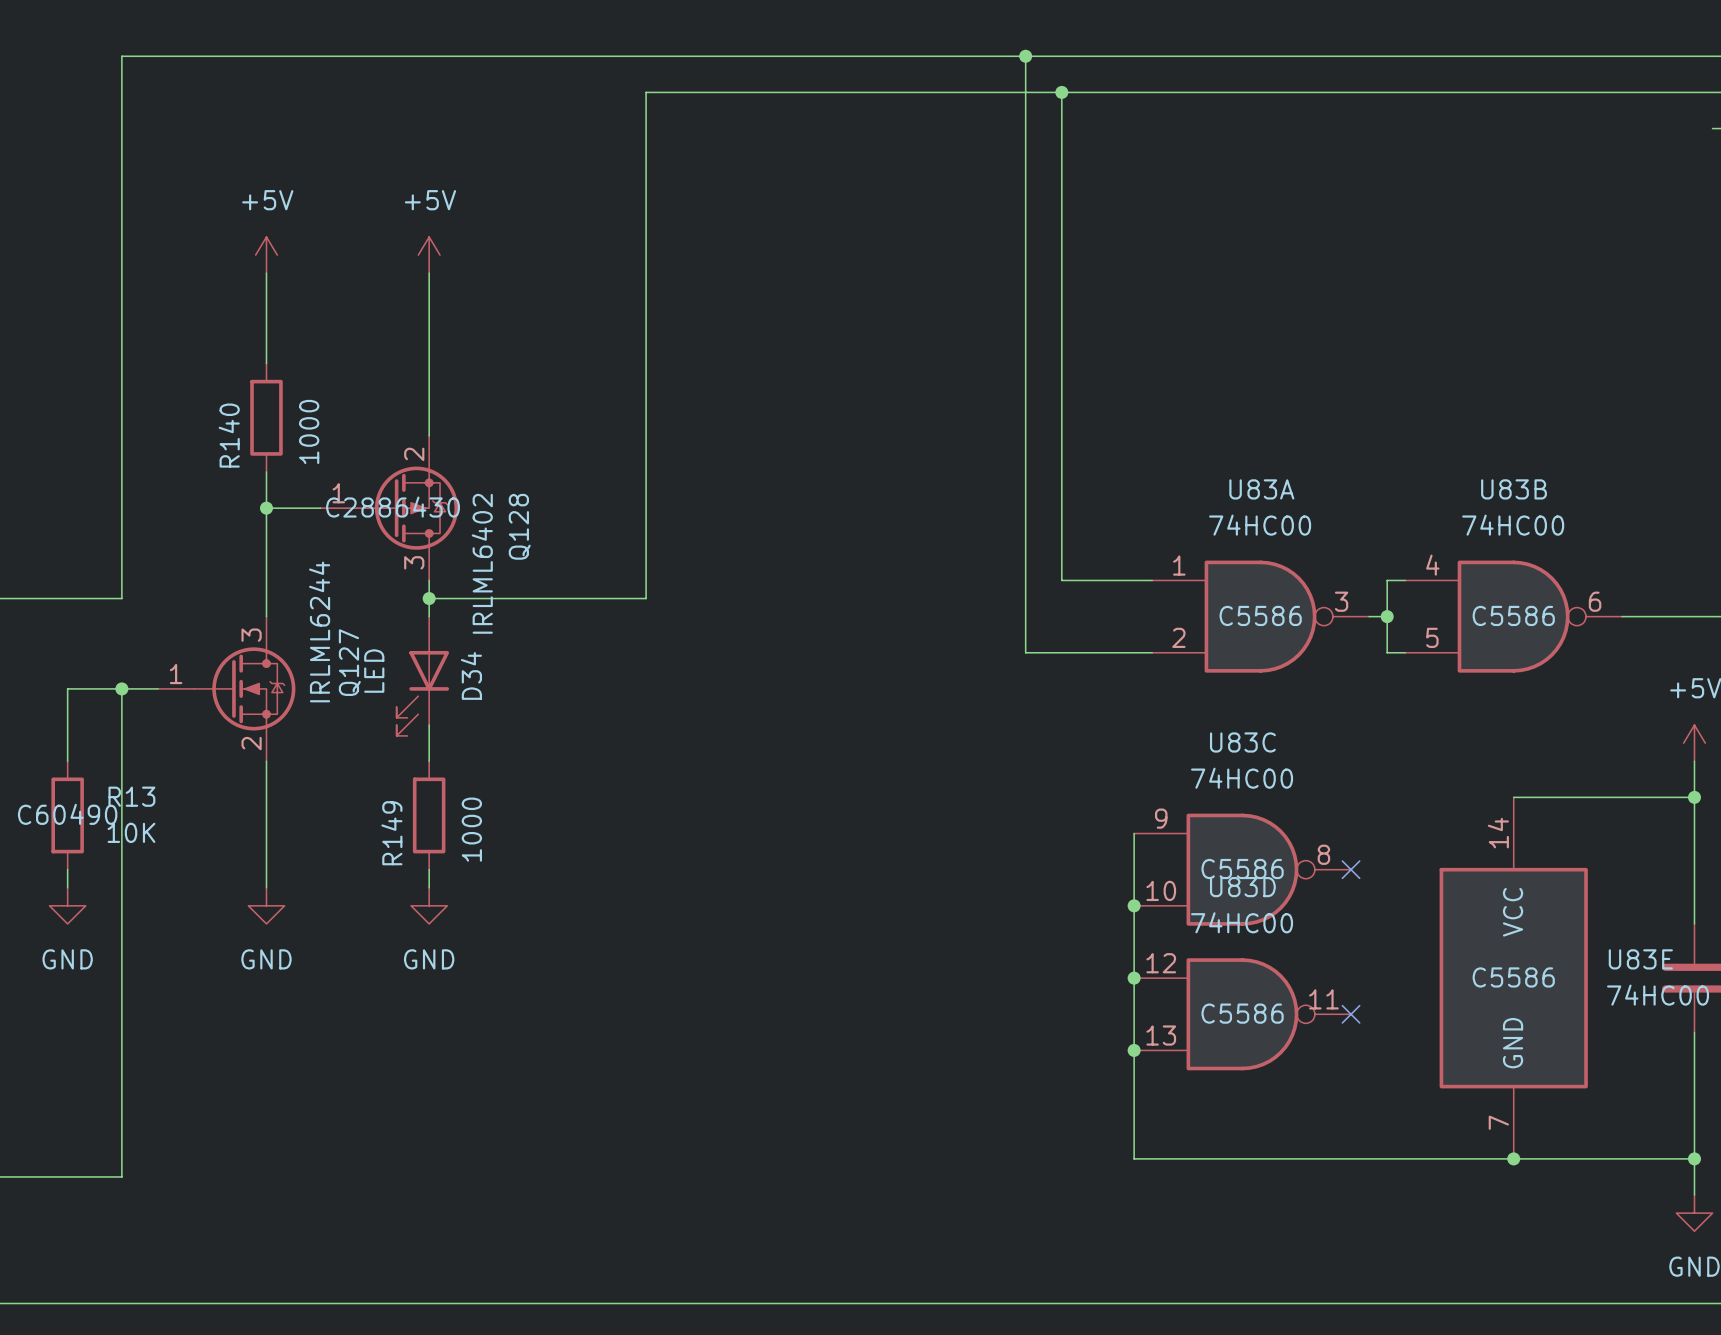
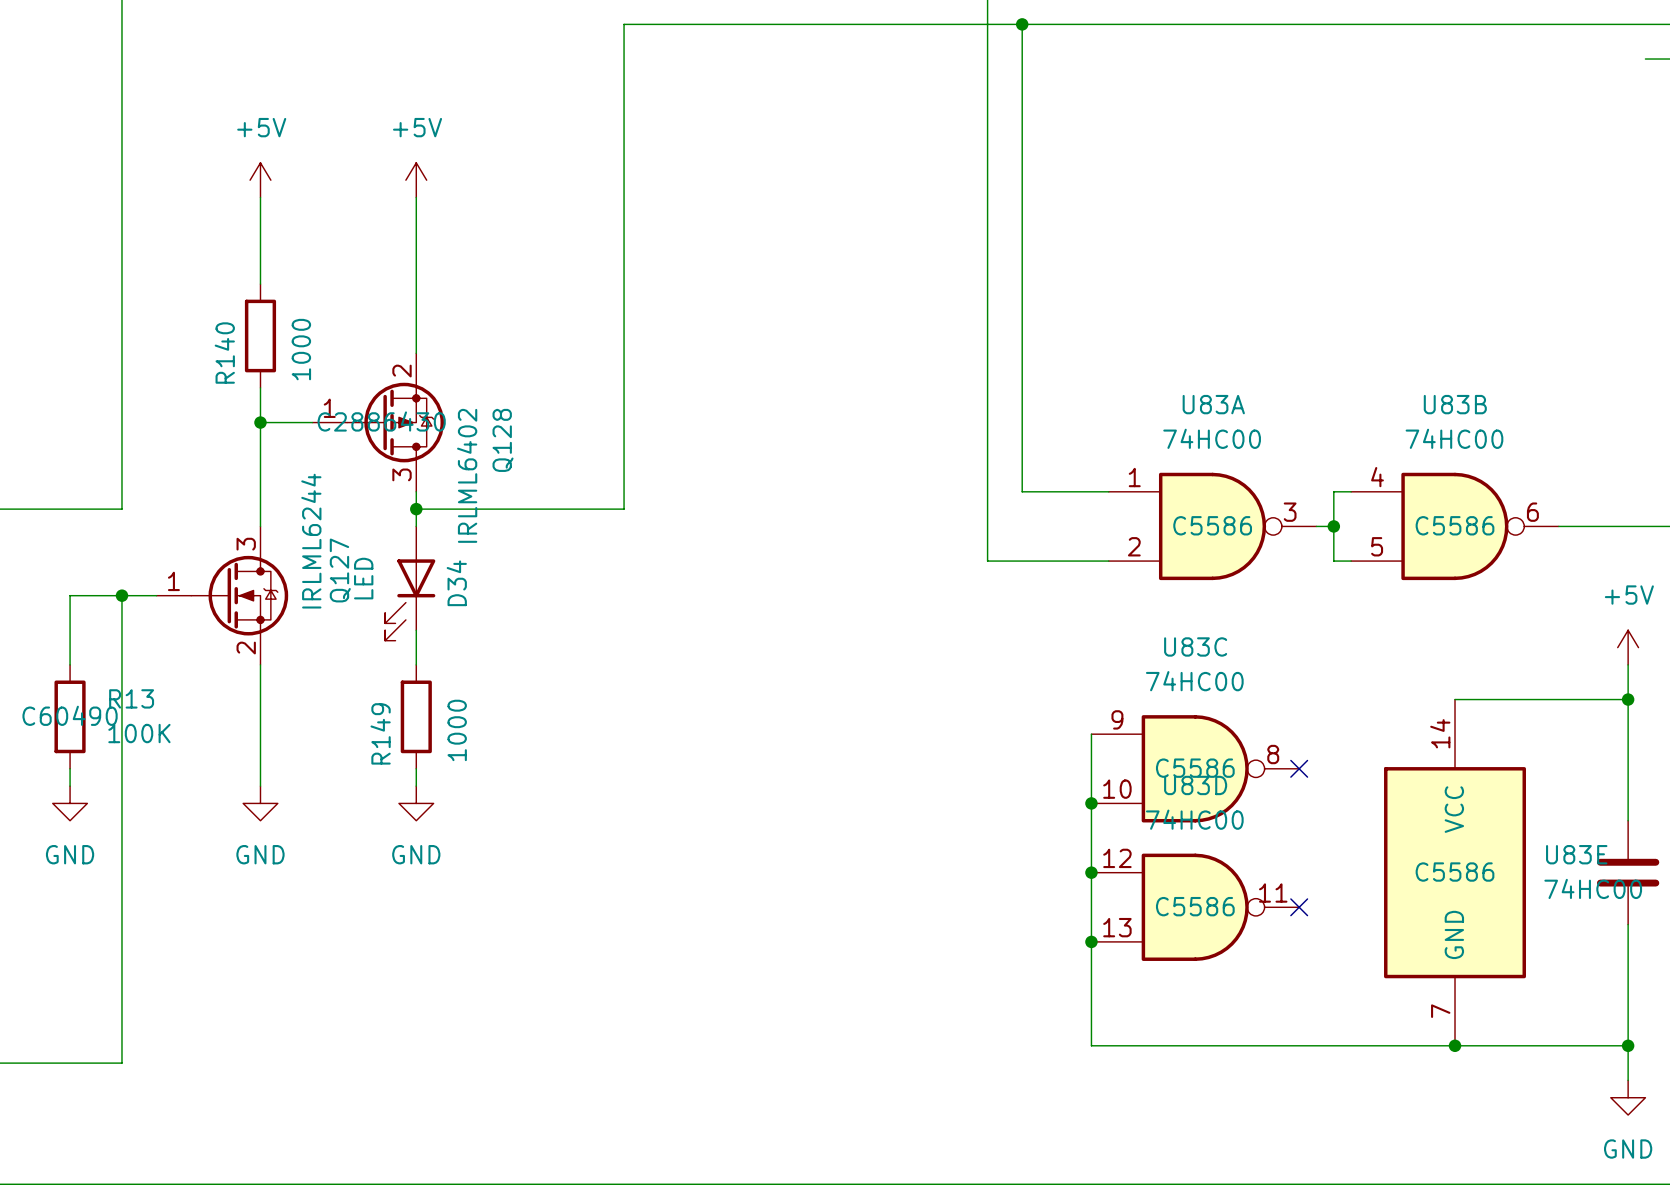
R13 value: 10K (131, 832) -> 100K (139, 733)

